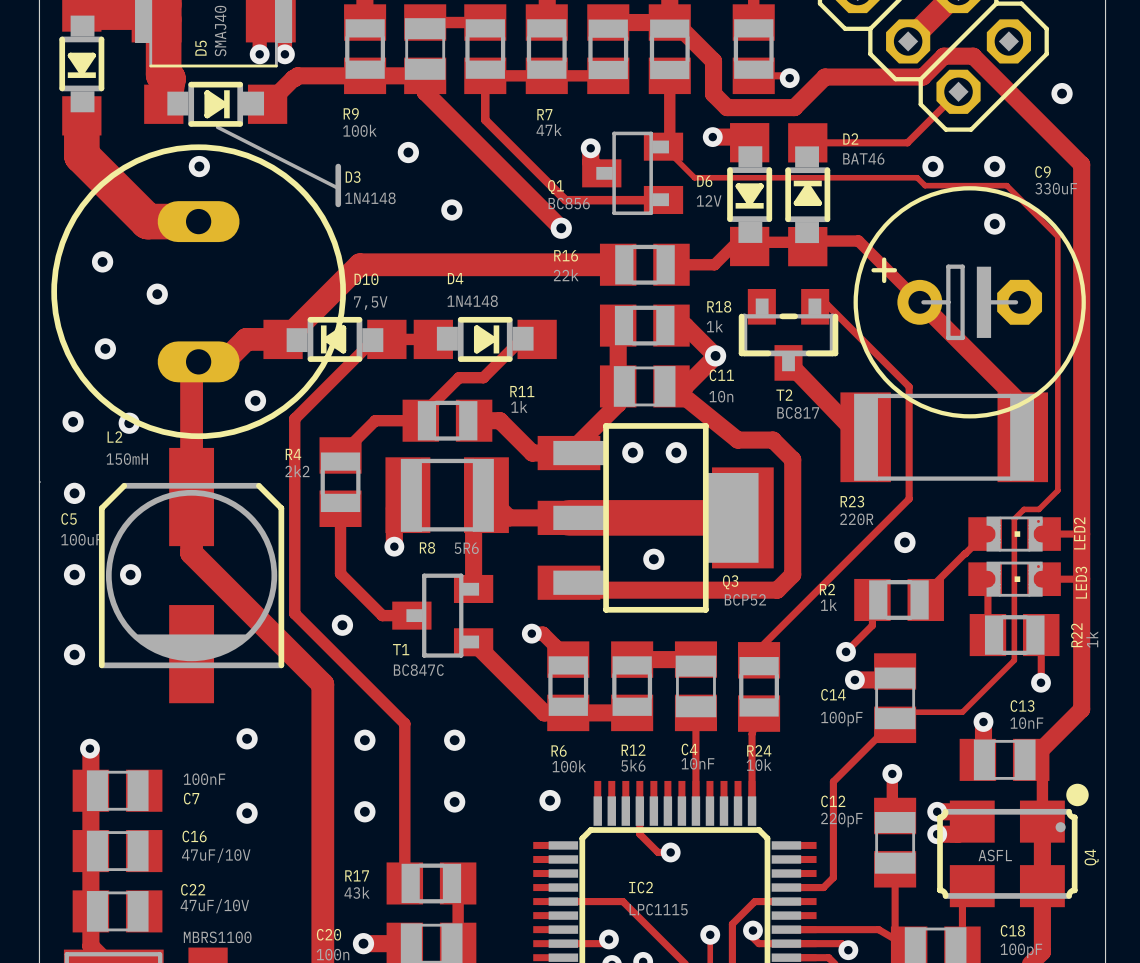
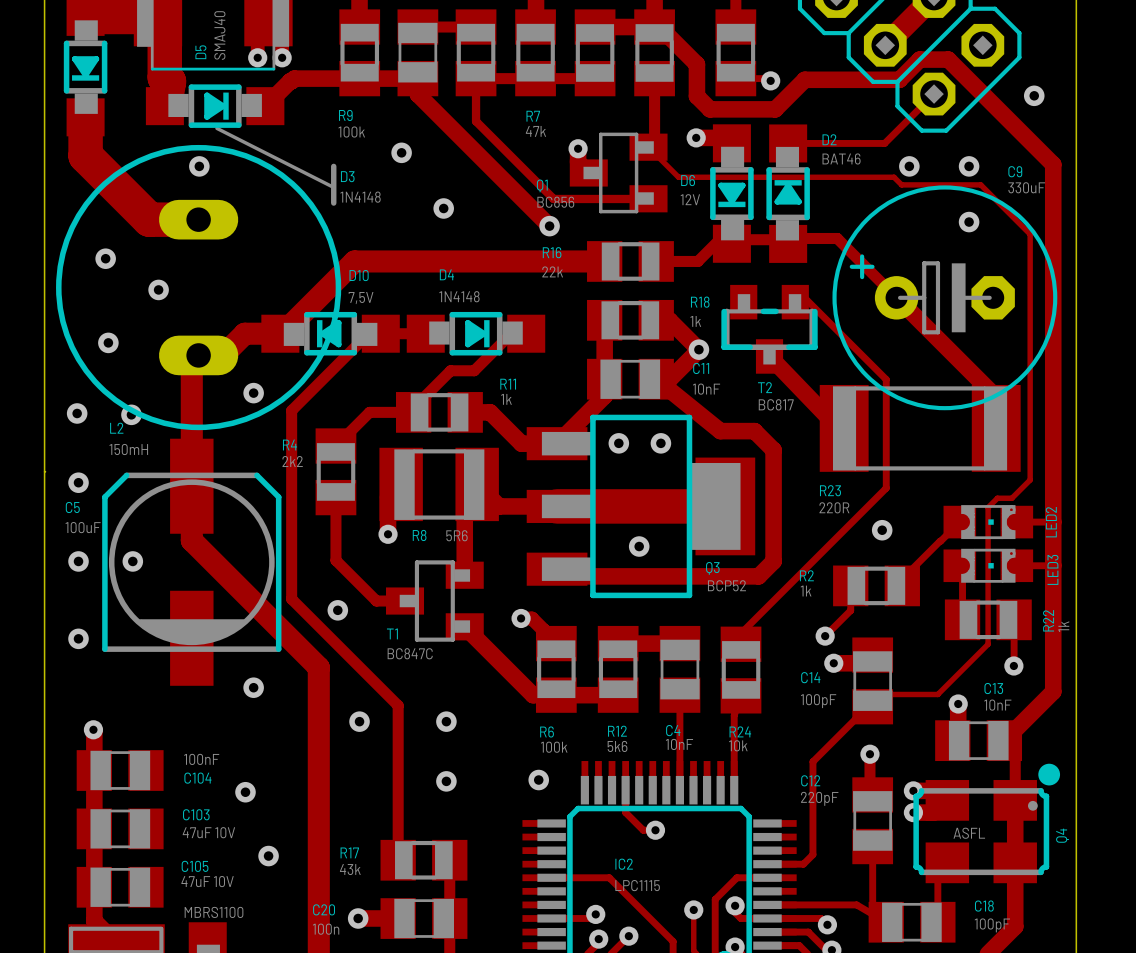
C11 value: 10n (721, 396) -> 10nF (706, 389)
via position: (247, 738) -> (253, 687)
C7 name: C7 (191, 798) -> C104 (197, 778)
via: (364, 811) -> none
C16 name: C16 (194, 836) -> C103 (196, 814)
C16 value: 47uF/10V (216, 855) -> 47uF 10V (208, 832)
via: none -> (268, 856)
C22 name: C22 (193, 889) -> C105 (195, 866)
C22 value: 47uF/10V (214, 906) -> 47uF 10V (207, 881)

